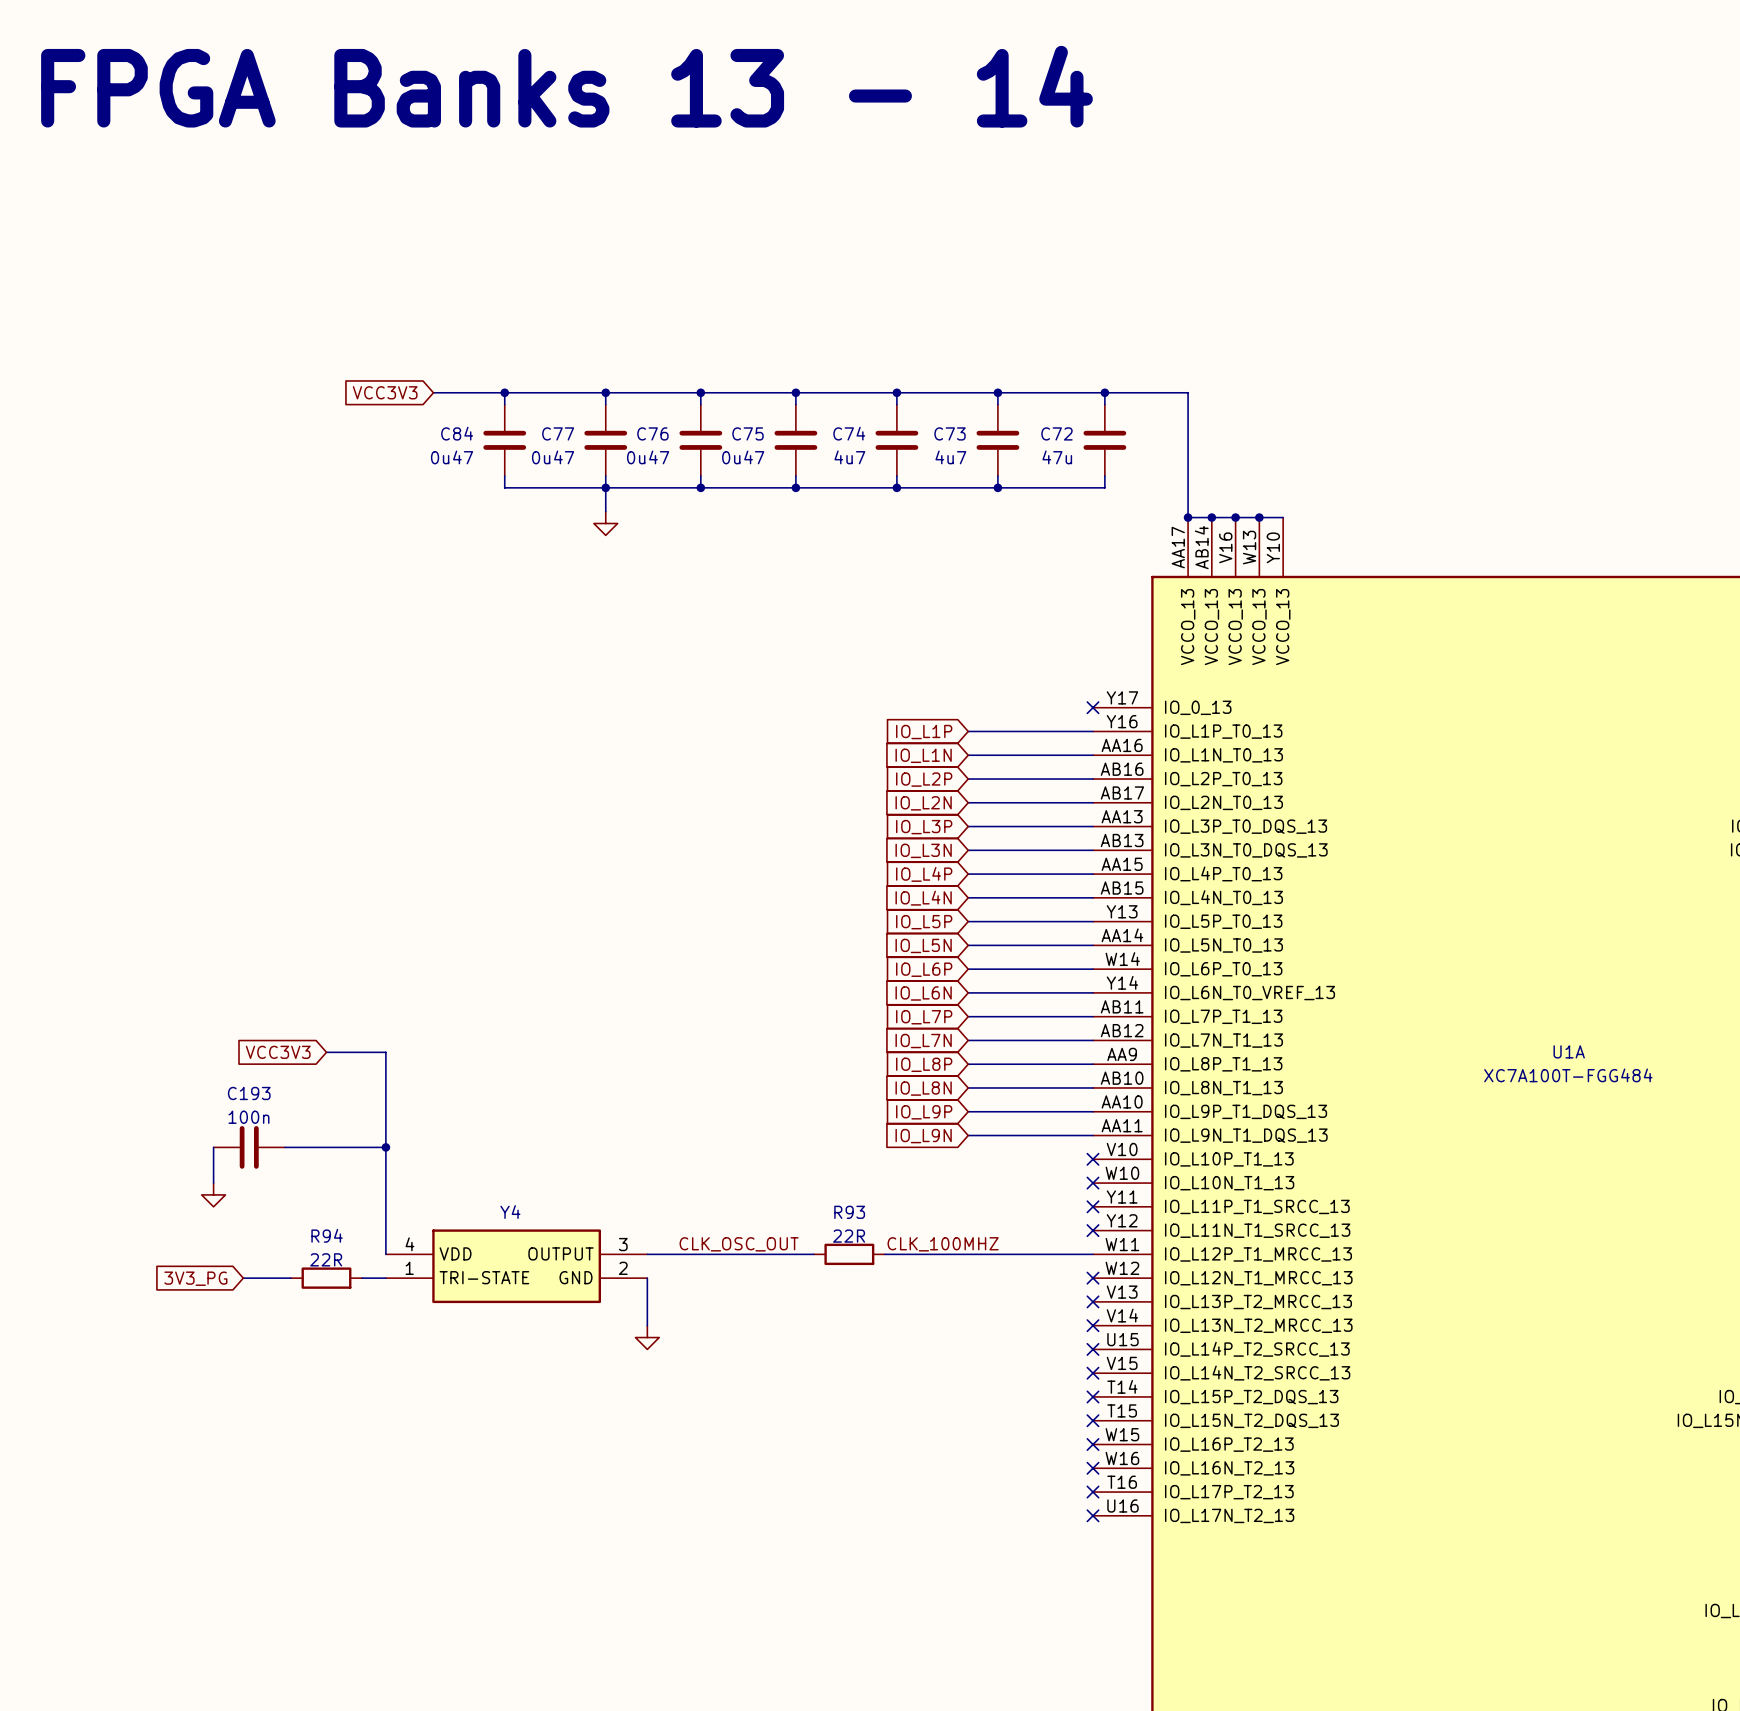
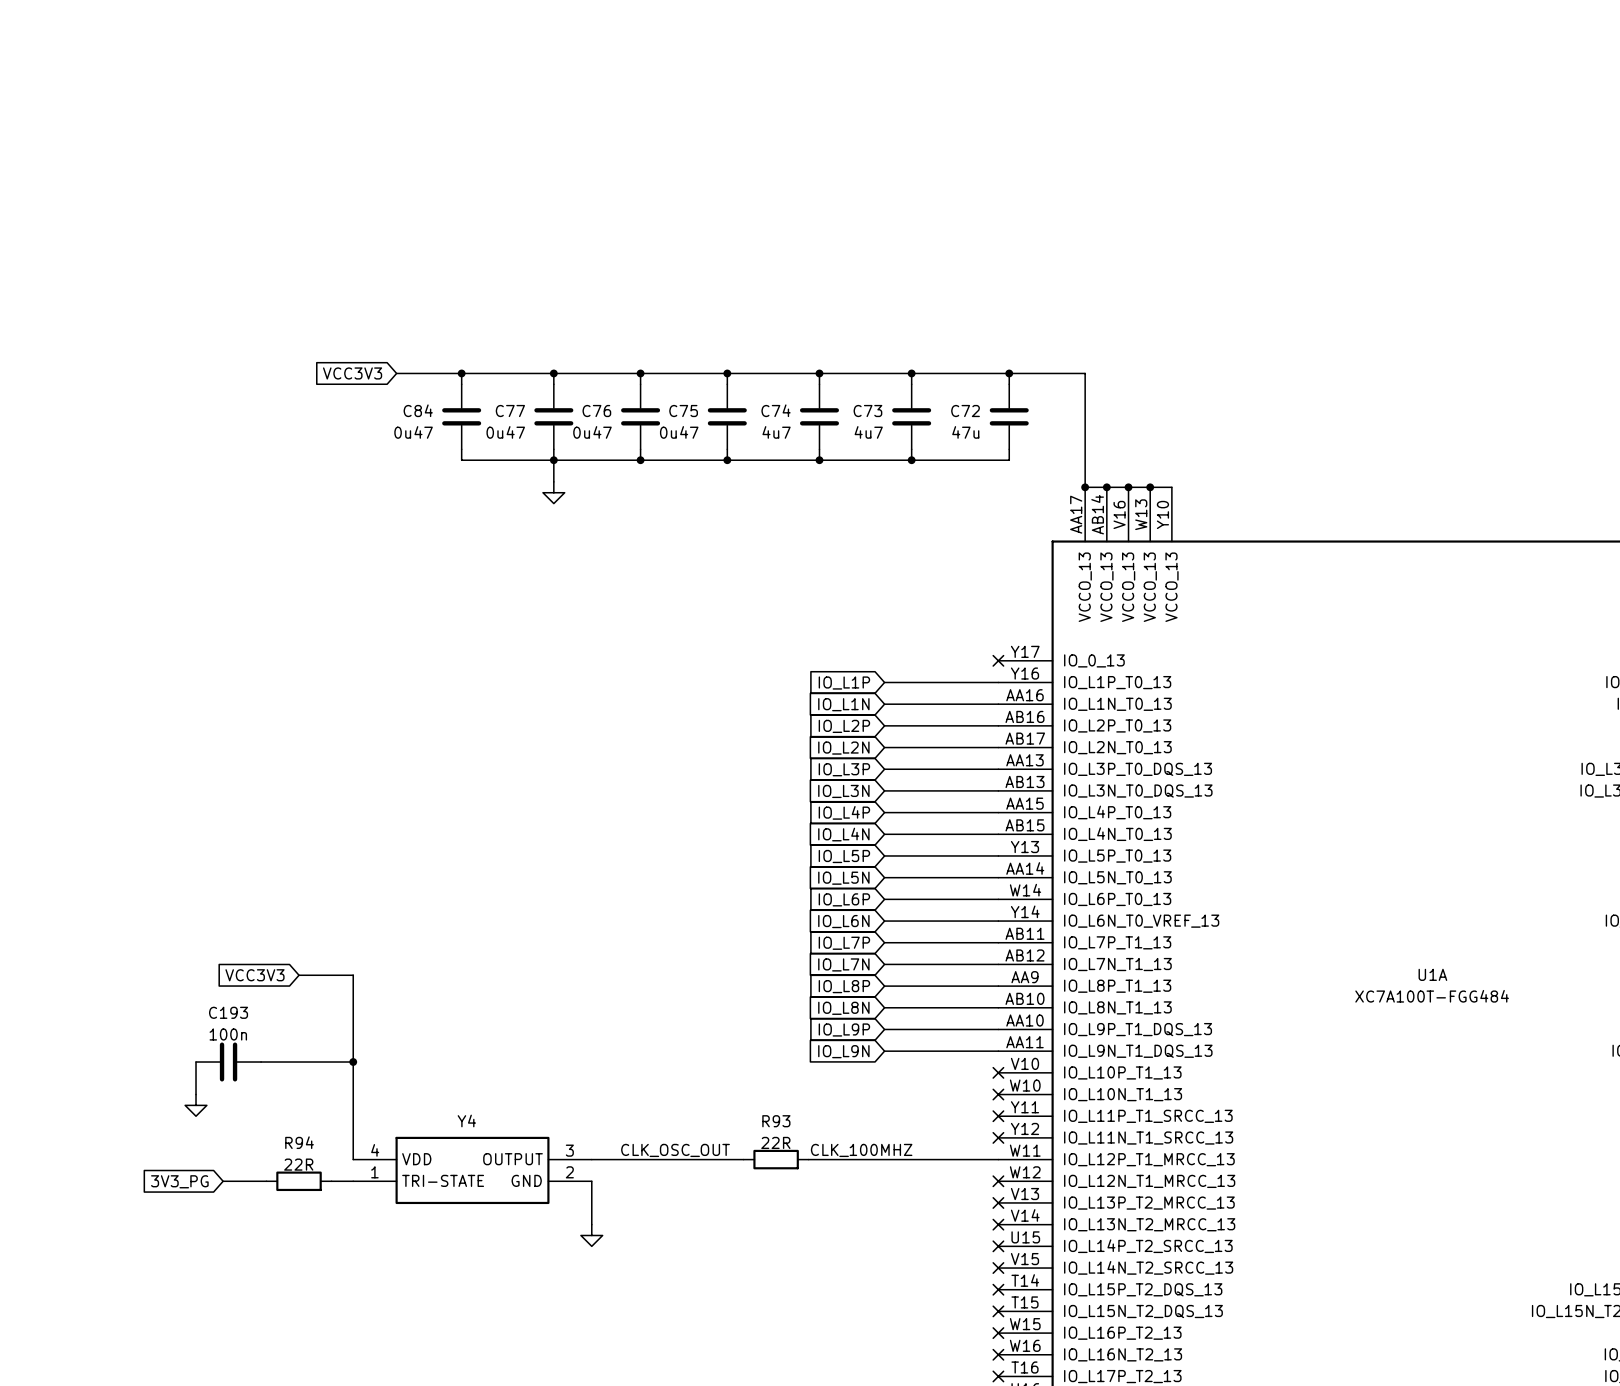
text: FPGA Banks 13 - 14 (566, 86) -> none

